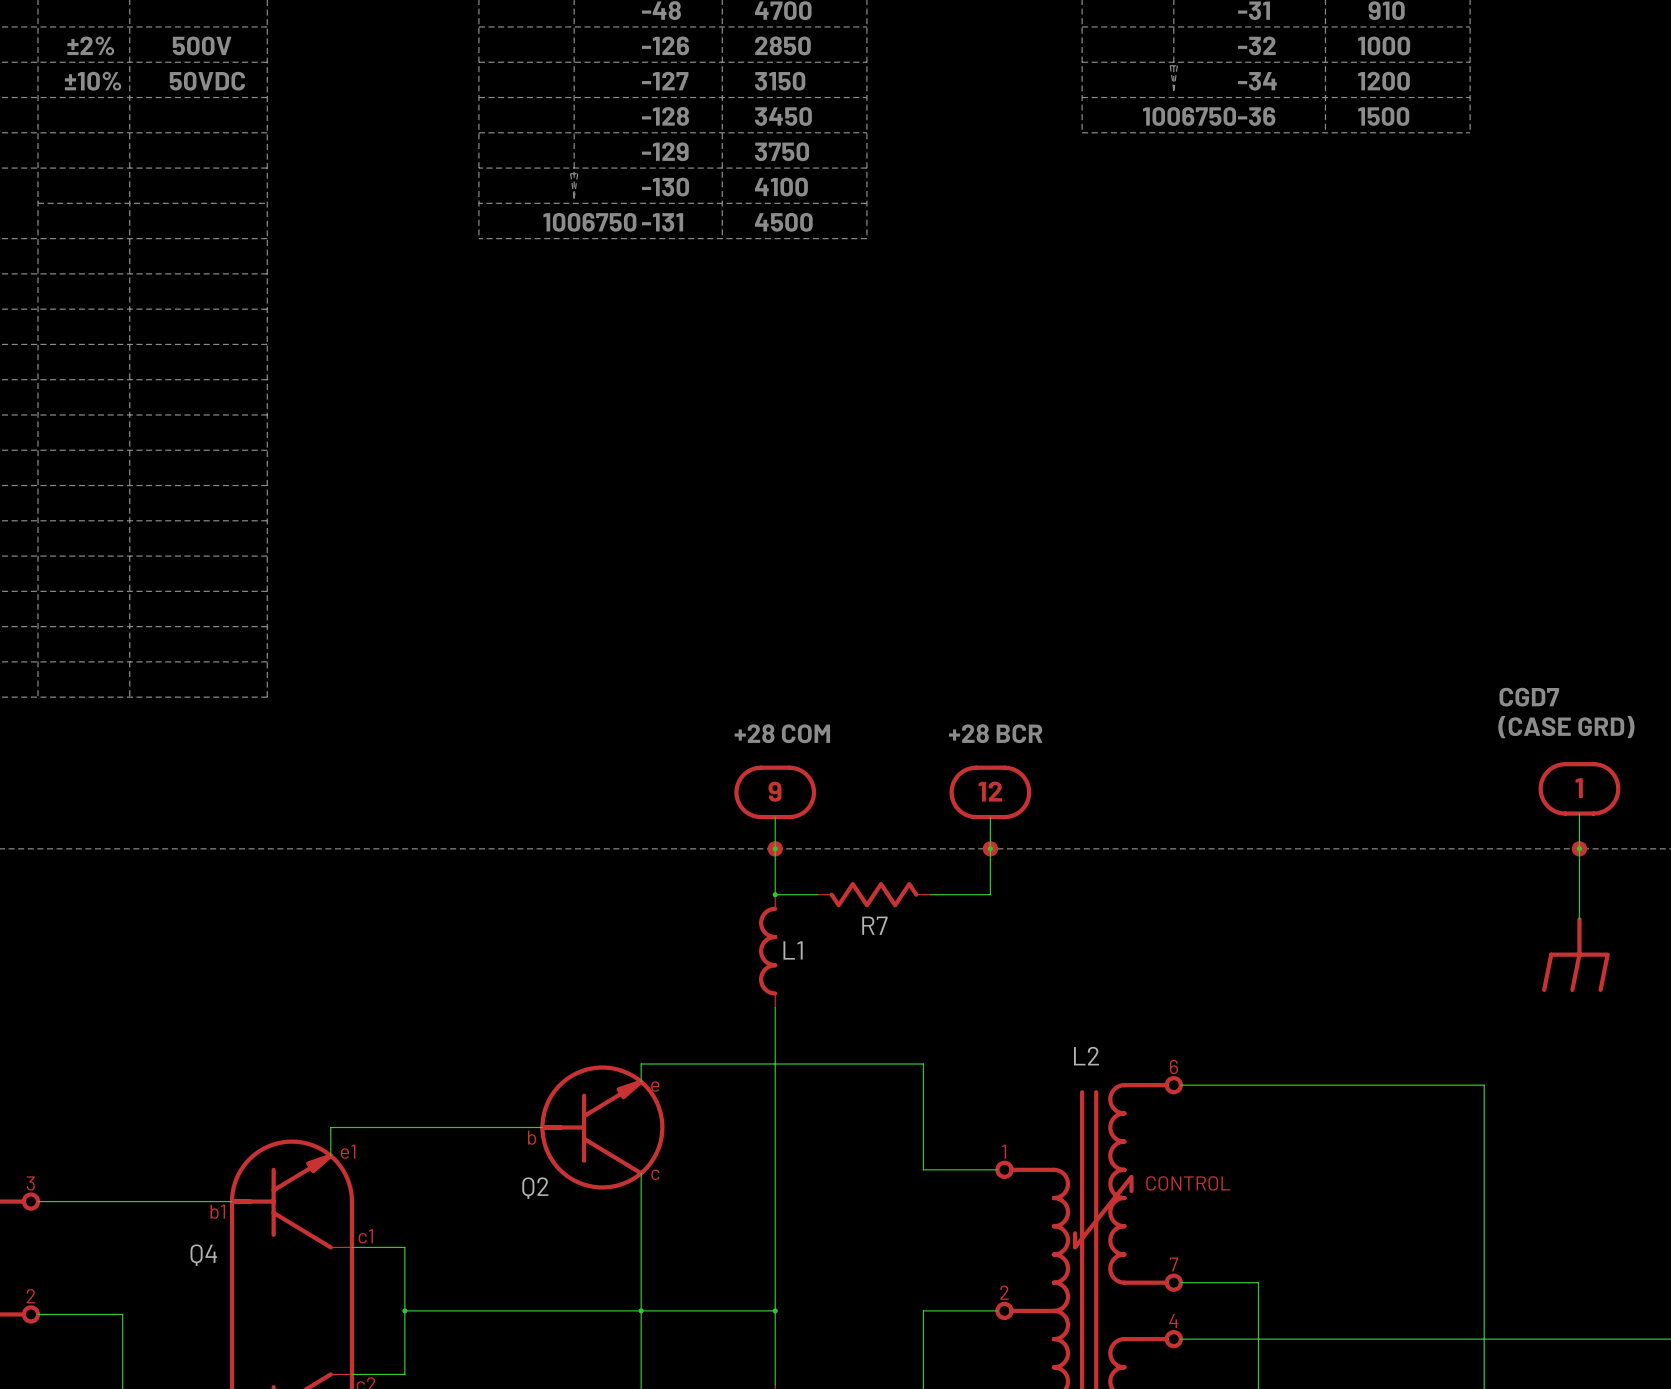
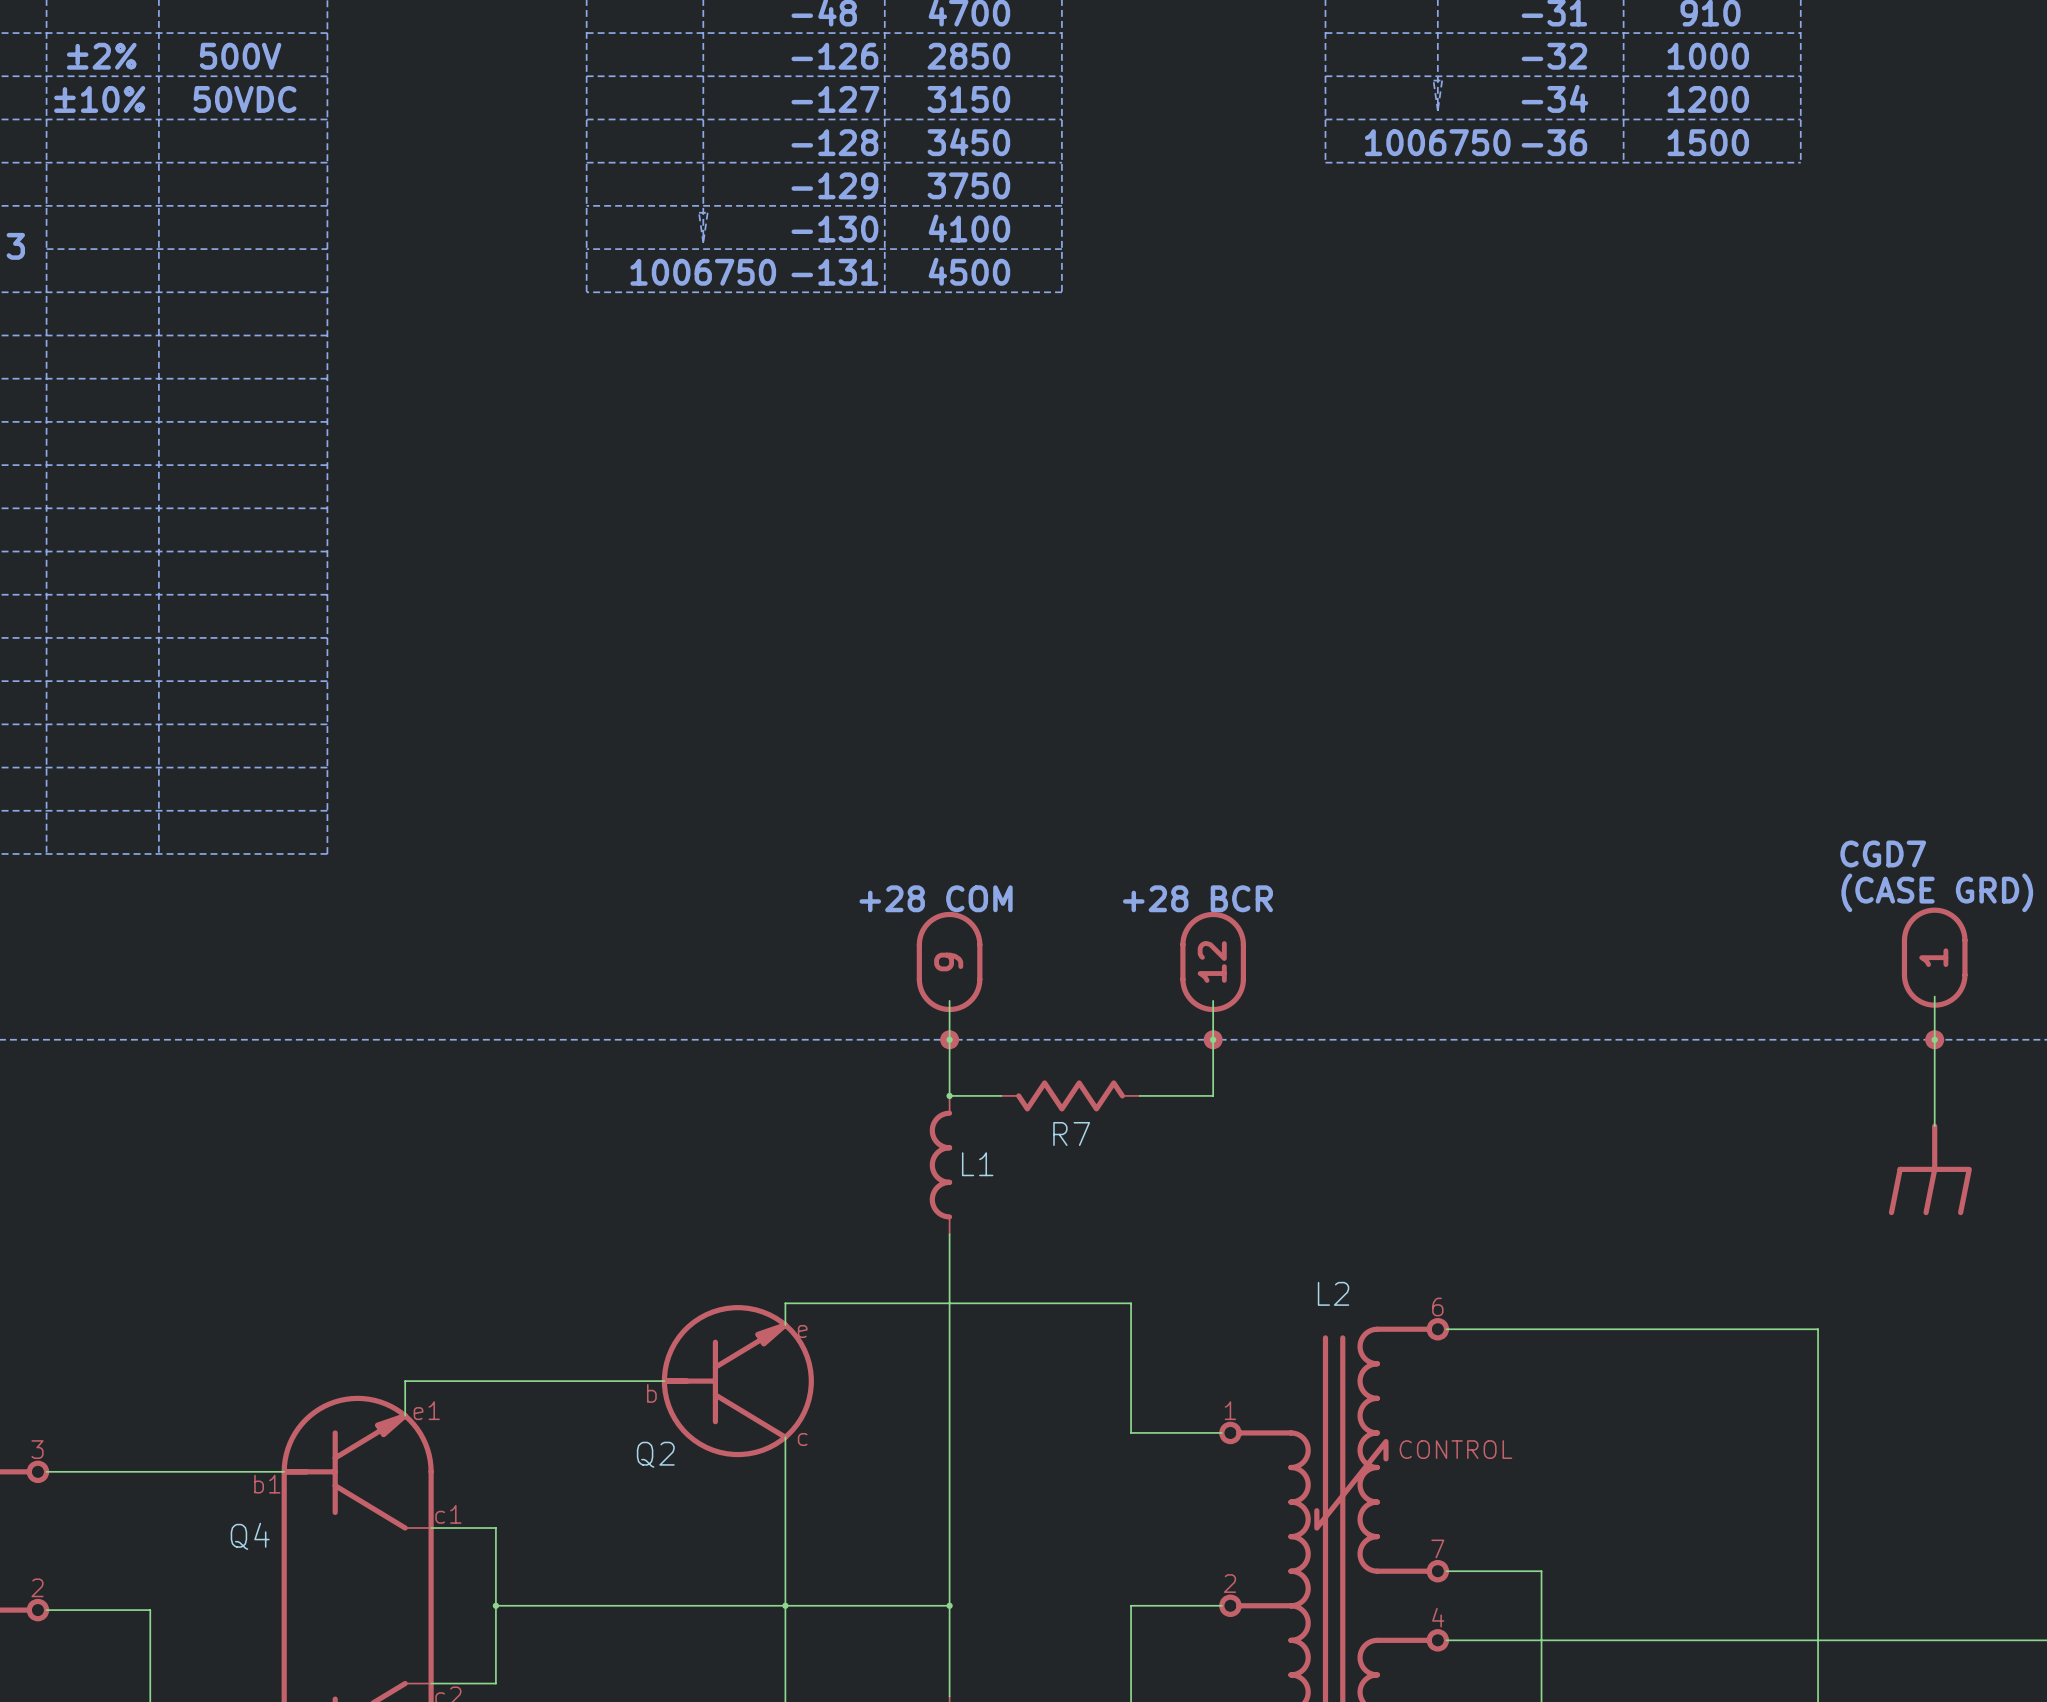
part rotation: 0° (1579, 788) -> 90° clockwise (1934, 957)
part rotation: 0° (775, 792) -> 90° clockwise (949, 961)
part rotation: 0° (990, 792) -> 90° clockwise (1213, 961)

